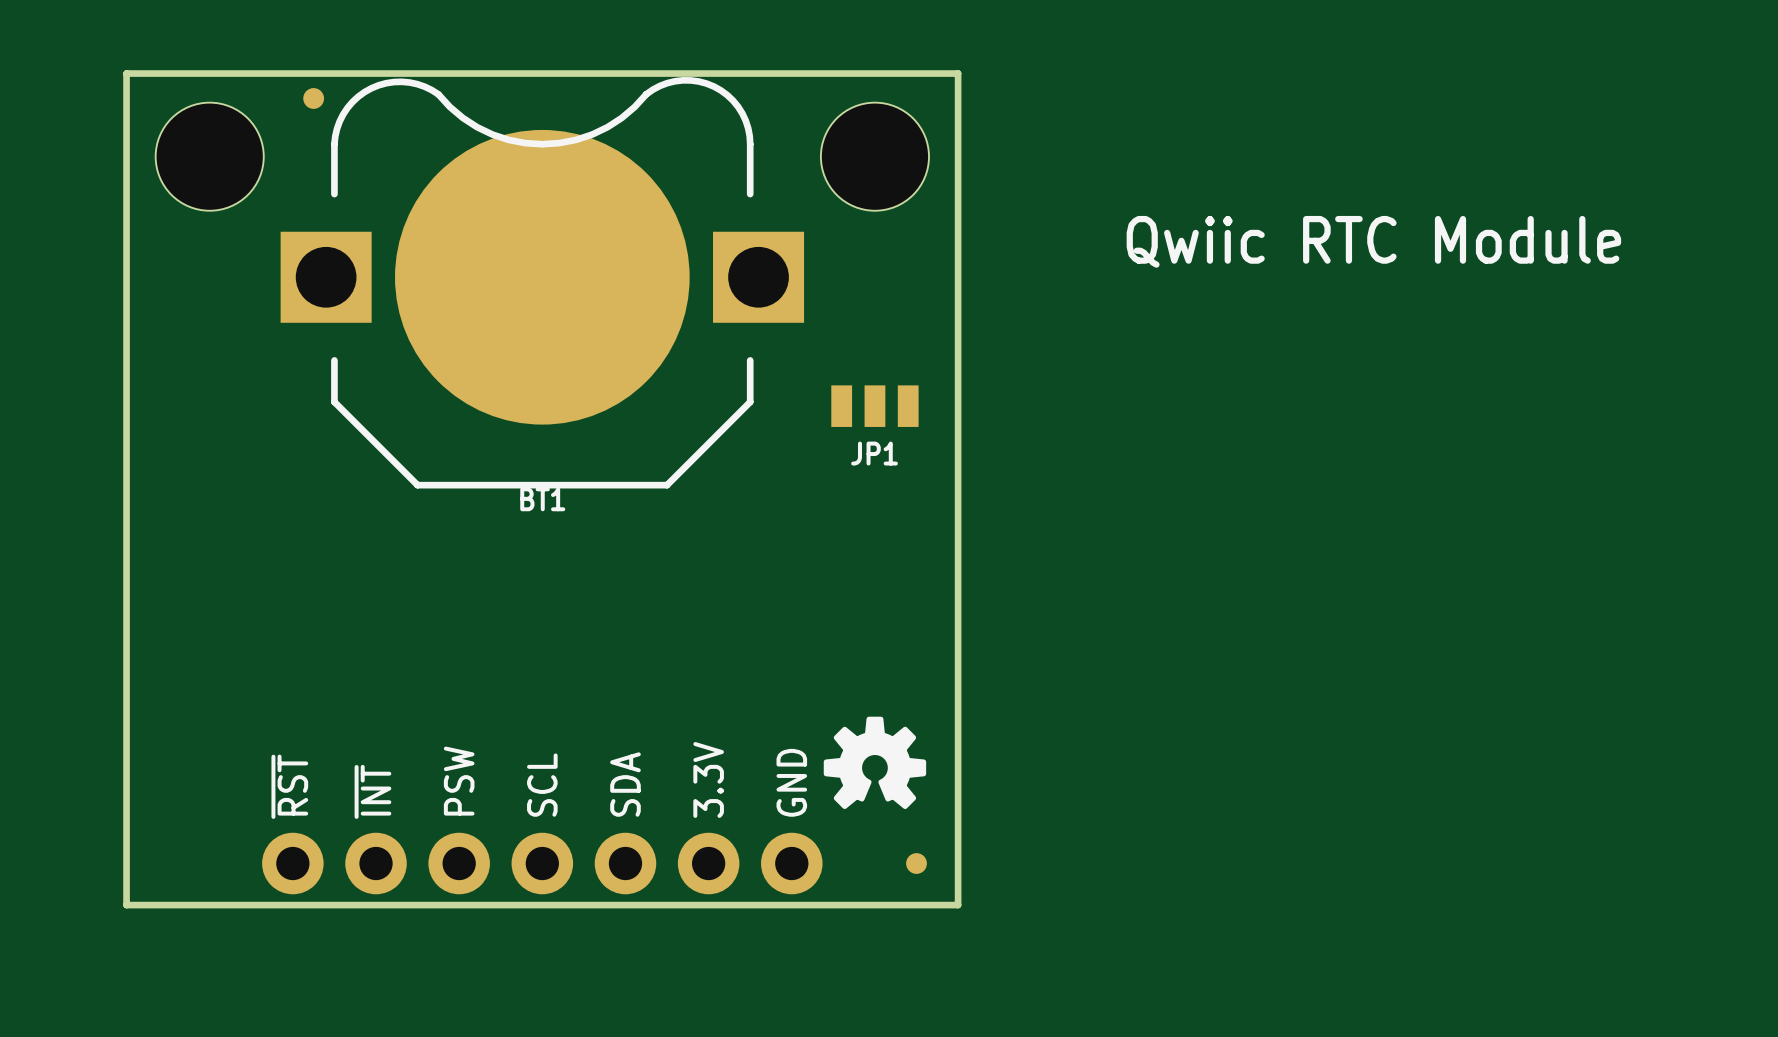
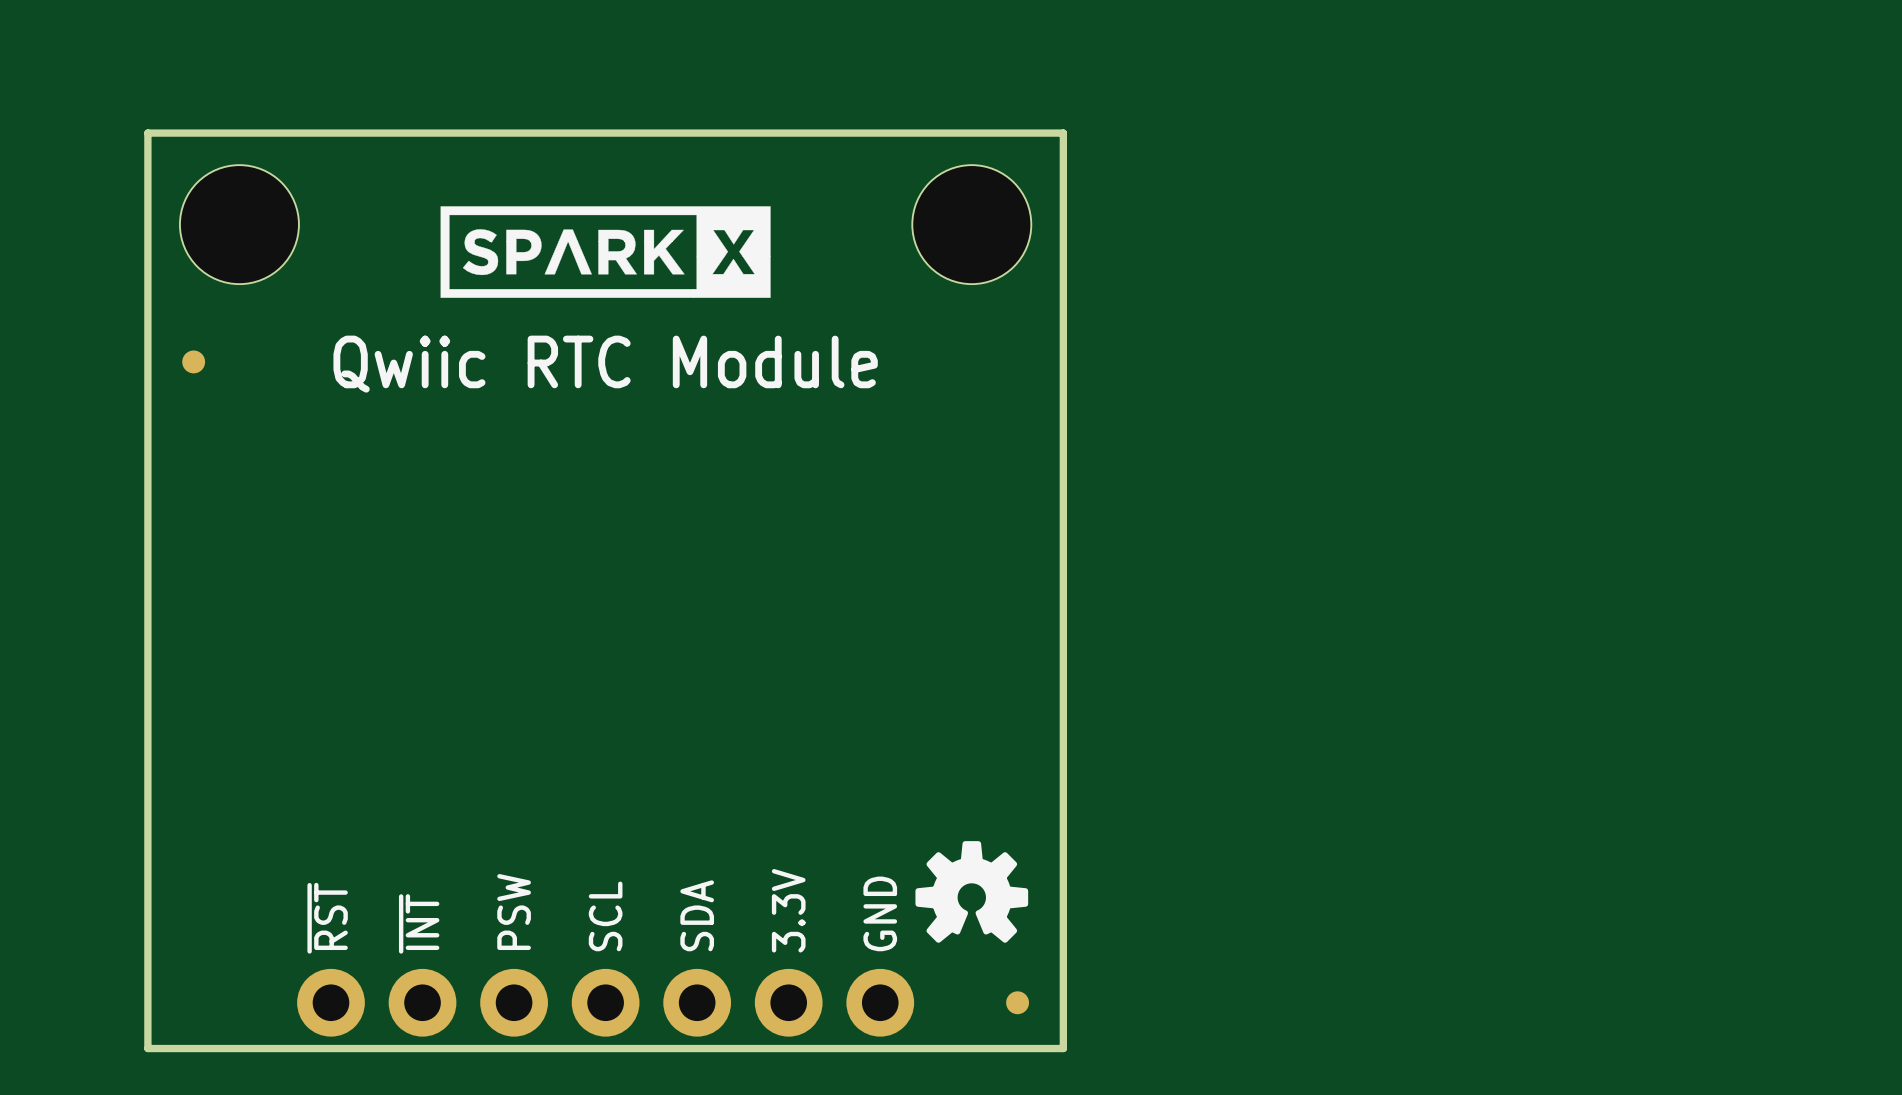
part position: (313, 98) -> (193, 361)
drawing: none -> [440, 206, 771, 298]
text: Qwiic RTC Module (1373, 241) -> none
BT1: (542, 282) -> none
text: none -> Qwiic RTC Module (605, 364)
JP1: (874, 406) -> none

